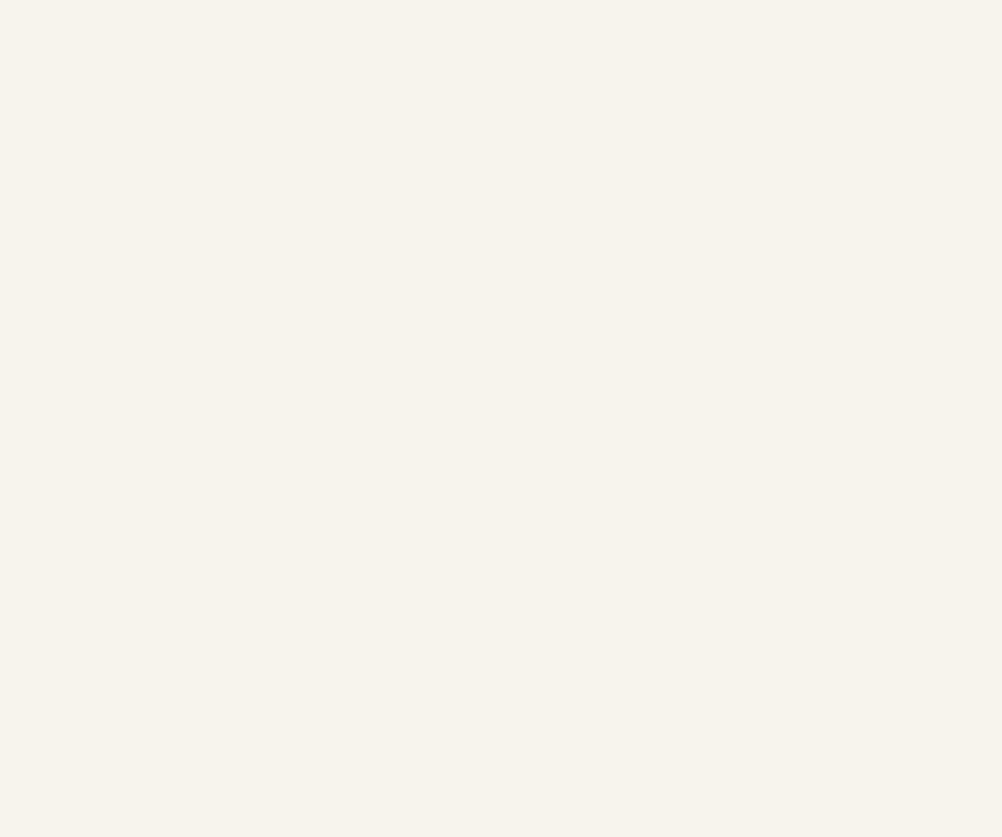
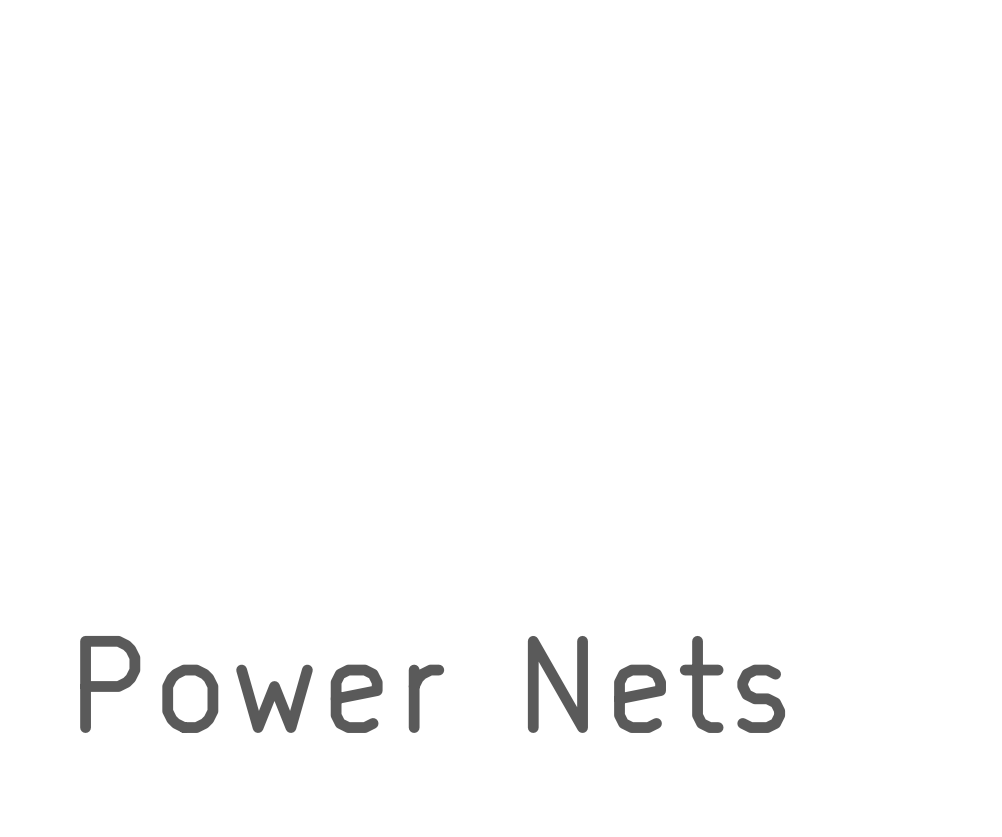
text: none -> Power Nets (432, 684)

